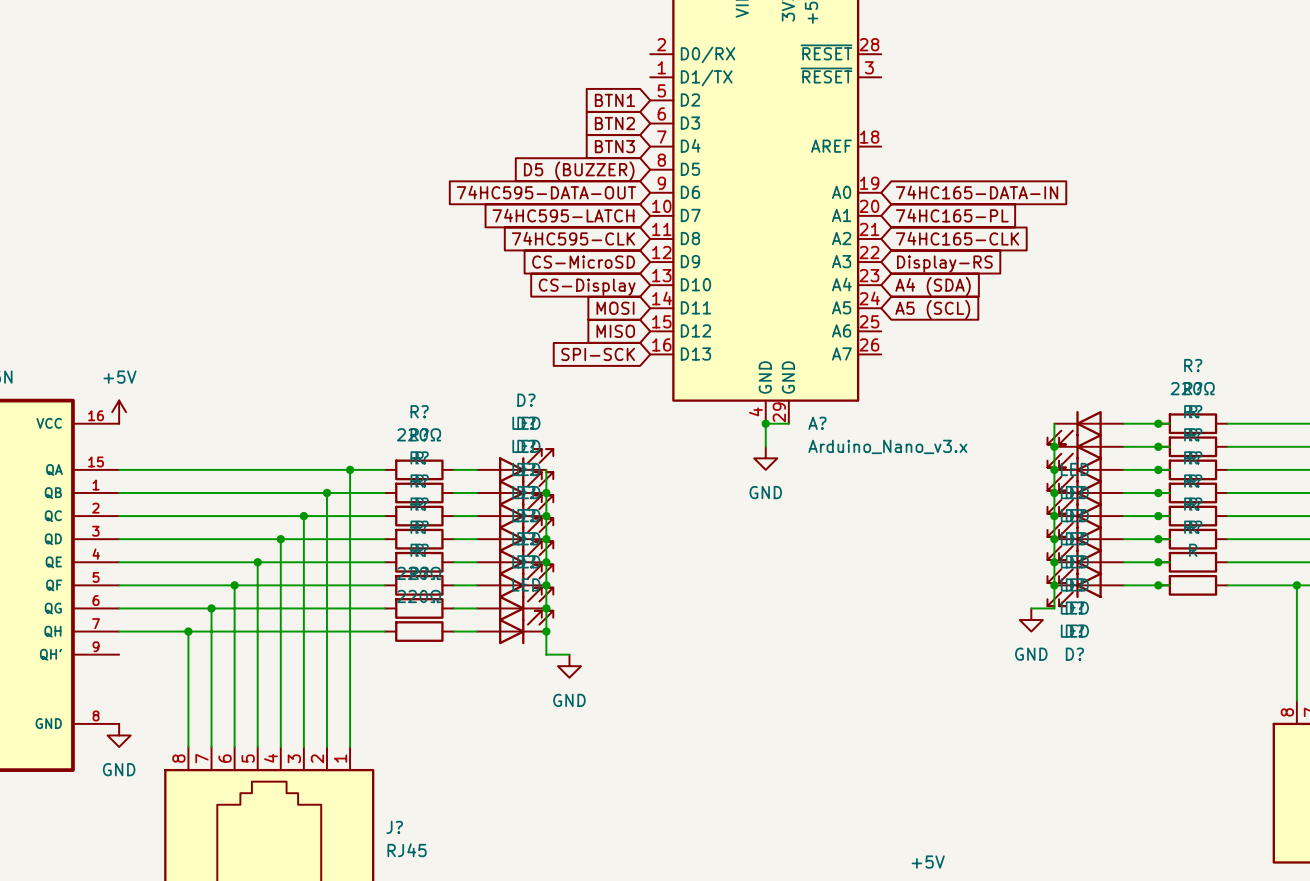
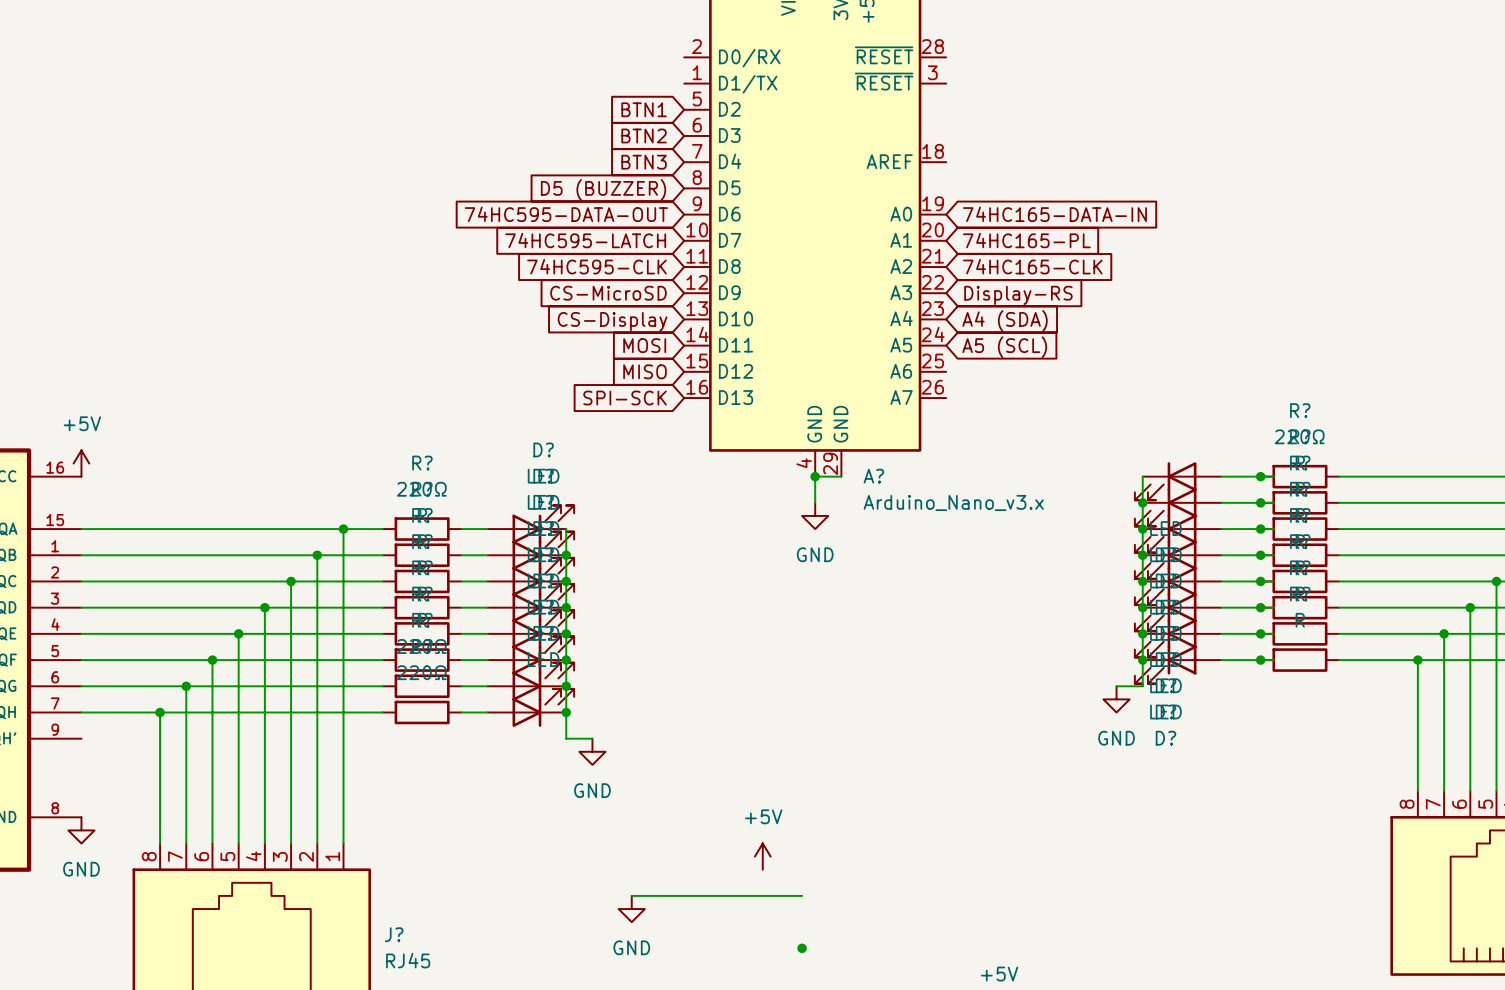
power symbol: none -> +5V (762, 856)
wire: none -> (631, 895) (802, 895)
power symbol: none -> GND (631, 909)
junction: none -> (802, 948)

